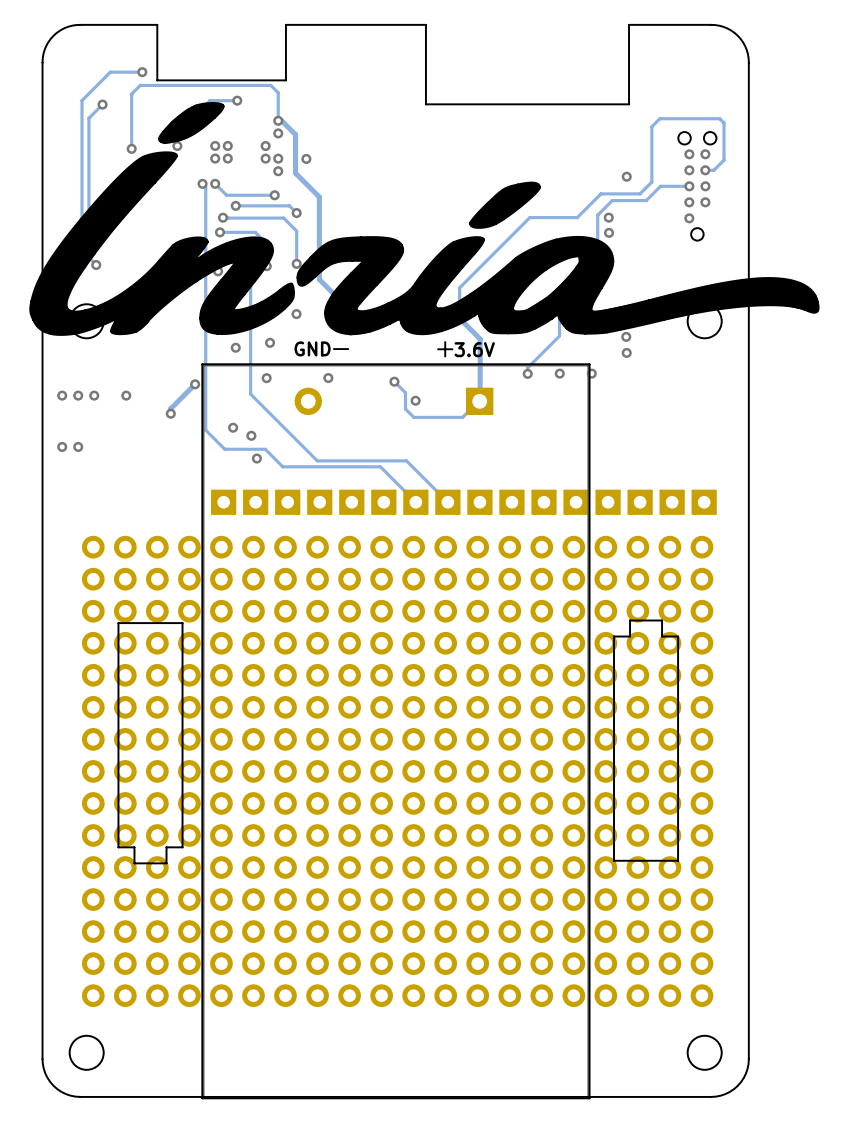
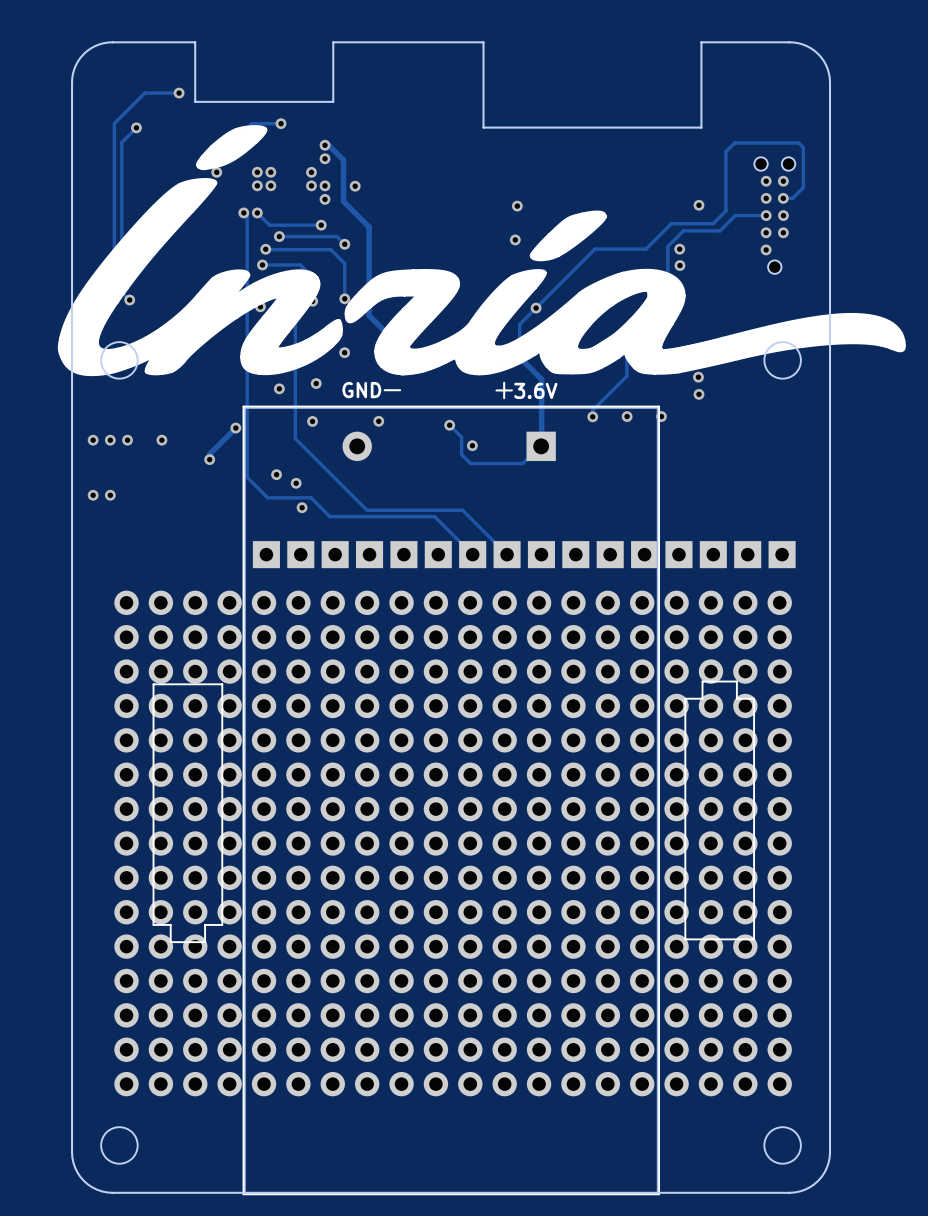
track: (278, 120) (278, 92) (270, 85) (140, 85) (131, 94) (131, 148) -> none
via: (131, 148) -> none
via: none -> (517, 206)
via: none -> (515, 239)
via: none -> (536, 308)

